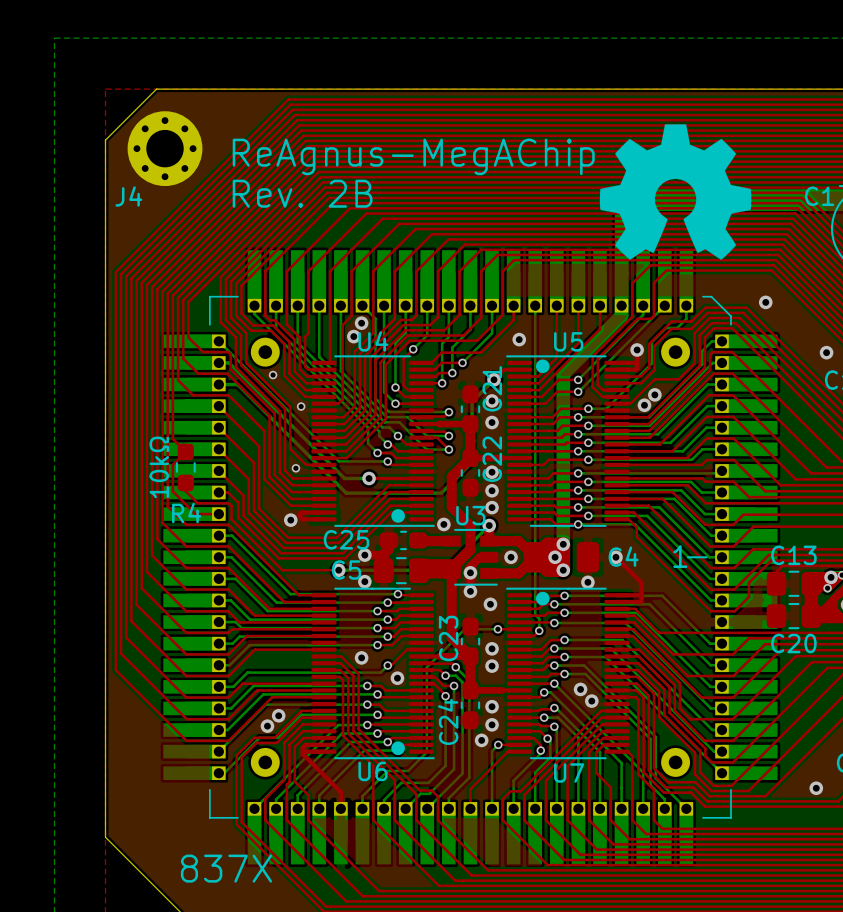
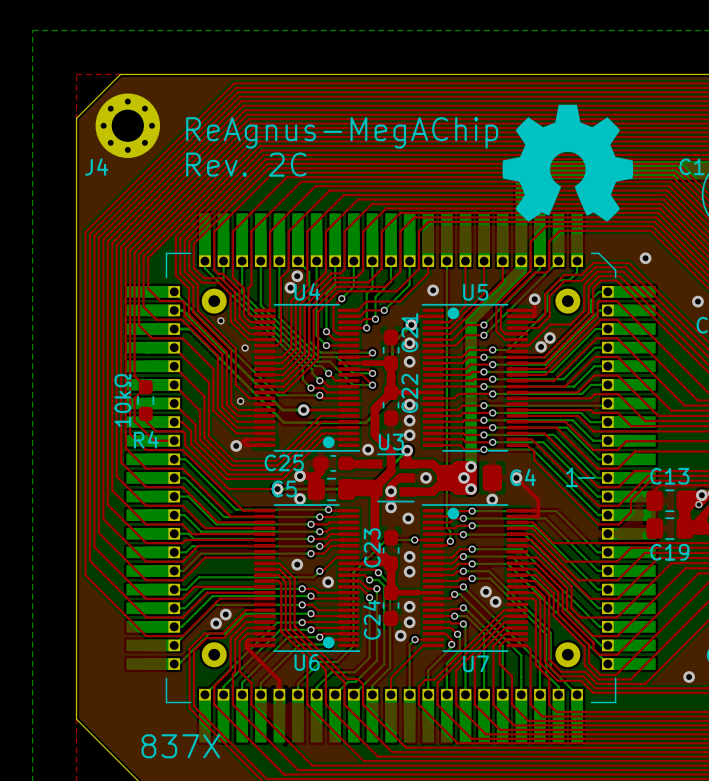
text: Rev. 2B (302, 193) -> Rev. 2C (246, 164)
C20 name: C20 (793, 643) -> C19 (669, 552)

